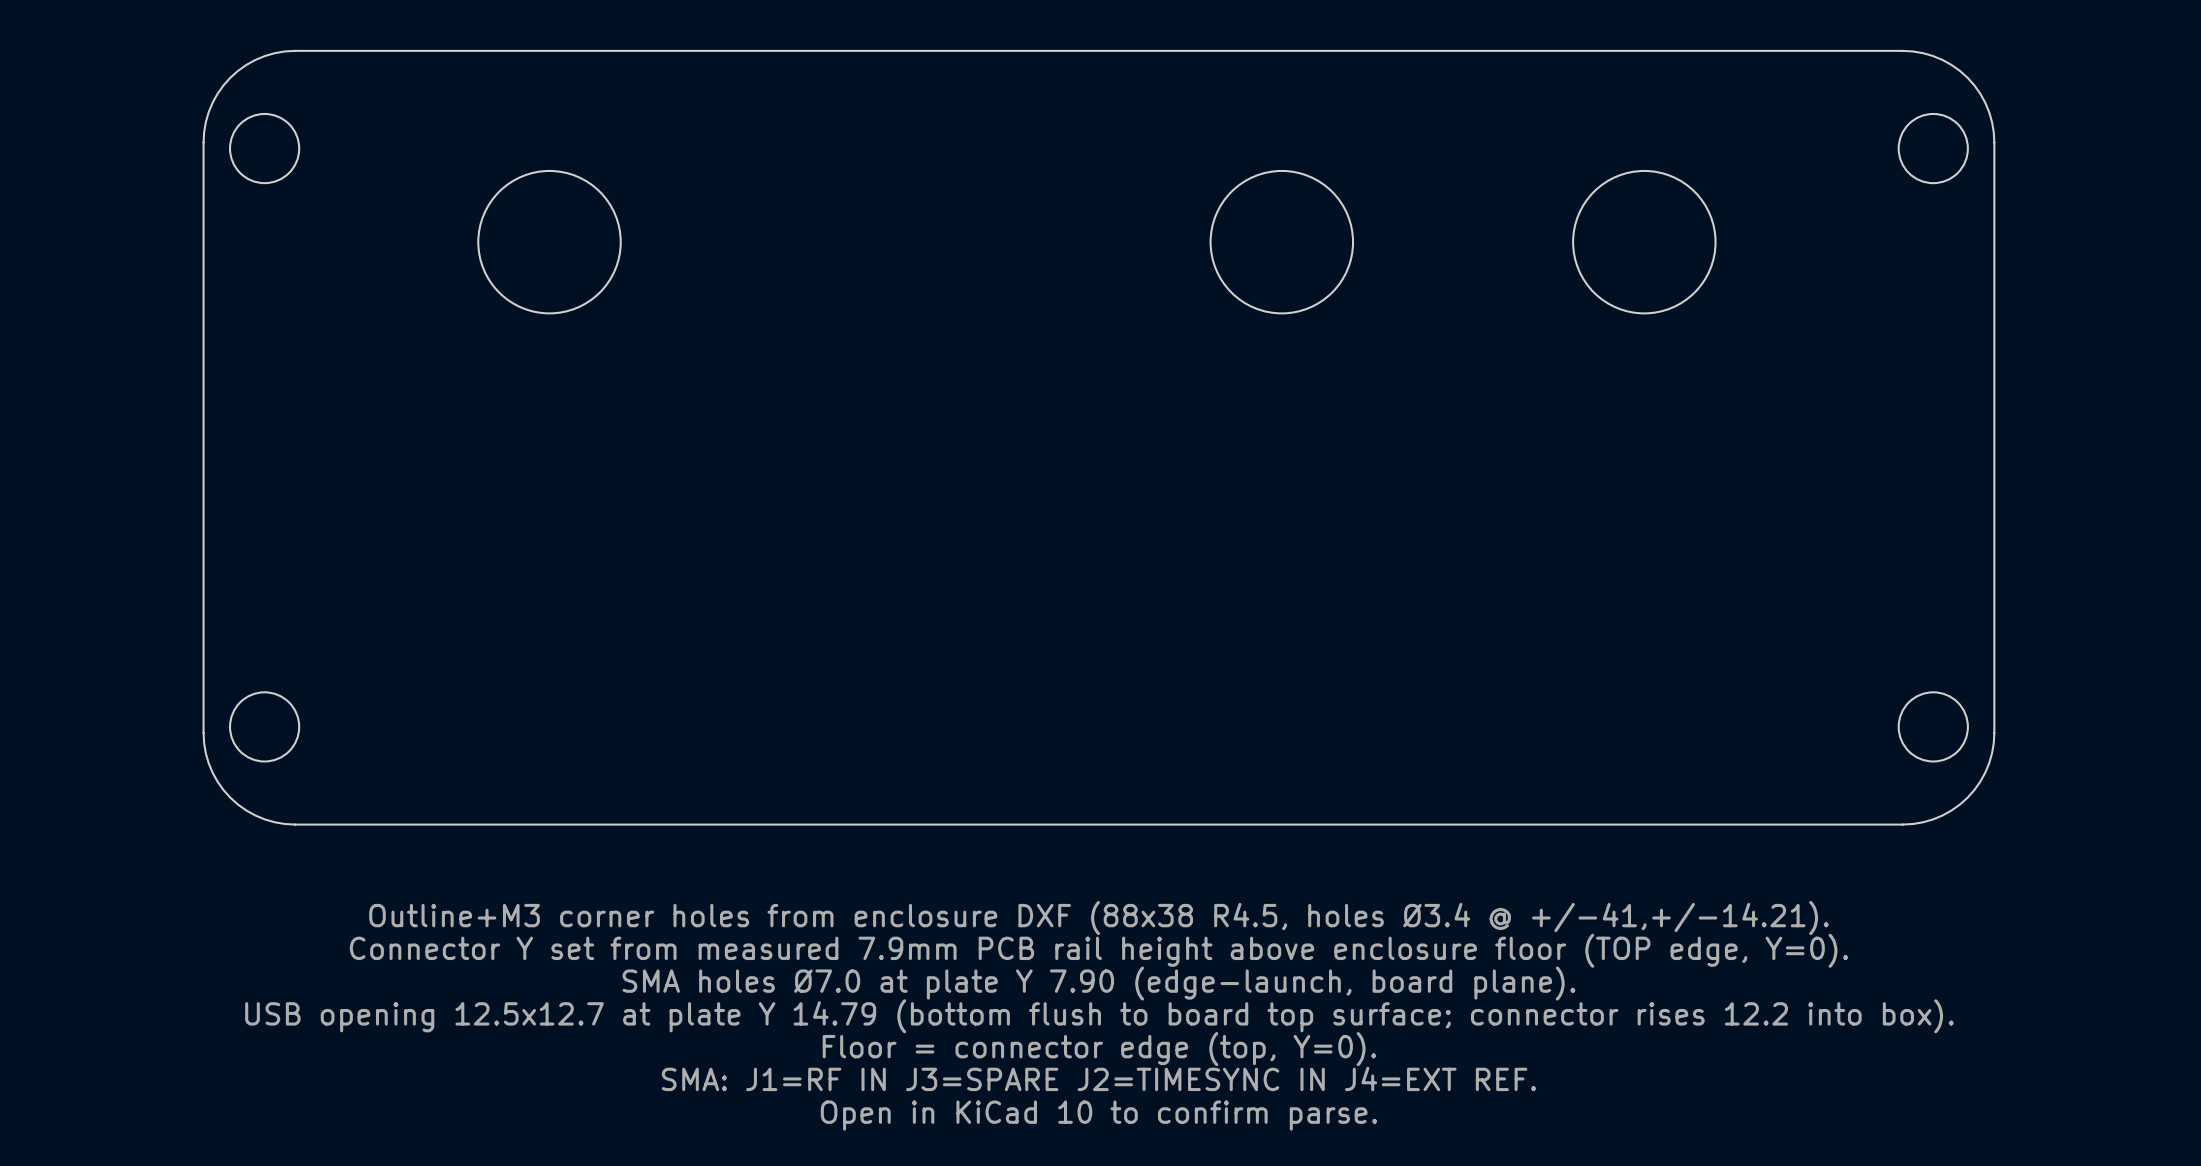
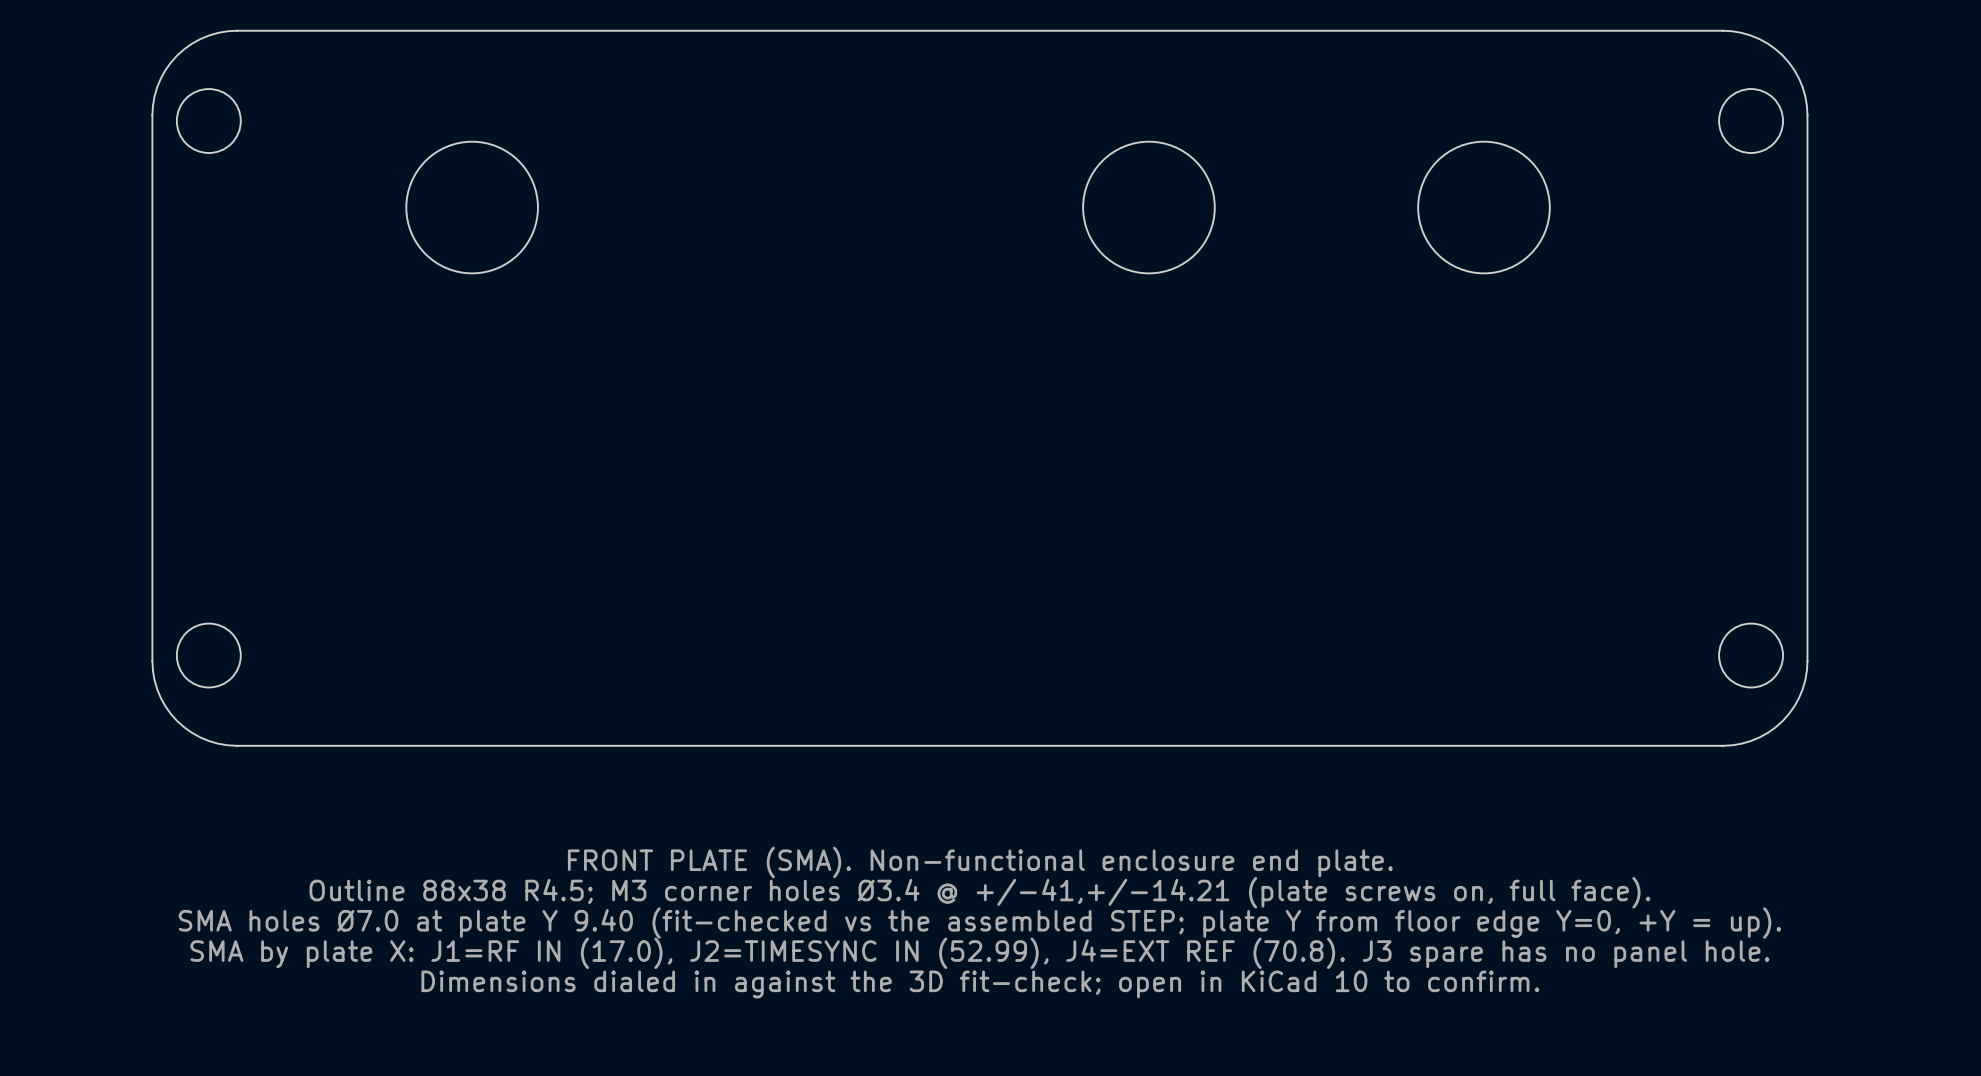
text: Outline+M3 corner holes from enclosure DXF (88x38 R4.5, holes Ø3.4 @ +/-41,+/-14.21). (1098, 918) -> none
text: Connector Y set from measured 7.9mm PCB rail height above enclosure floor (TOP edge, Y=0). (1098, 950) -> FRONT PLATE (SMA). Non-functional enclosure end plate. (980, 862)
text: SMA holes Ø7.0 at plate Y 7.90 (edge-launch, board plane). (1098, 983) -> Outline 88x38 R4.5; M3 corner holes Ø3.4 @ +/-41,+/-14.21 (plate screws on, full face). (979, 892)
text: USB opening 12.5x12.7 at plate Y 14.79 (bottom flush to board top surface; connector rises 12.2 into box). (1099, 1016) -> SMA holes Ø7.0 at plate Y 9.40 (fit-checked vs the assembled STEP; plate Y from floor edge Y=0, +Y = up). (979, 923)
text: Floor = connector edge (top, Y=0). (1099, 1049) -> SMA by plate X: J1=RF IN (17.0), J2=TIMESYNC IN (52.99), J4=EXT REF (70.8). J3 spare has no panel hole. (979, 953)
text: SMA: J1=RF IN J3=SPARE J2=TIMESYNC IN J4=EXT REF. (1098, 1078) -> Dimensions dialed in against the 3D fit-check; open in KiCad 10 to confirm. (980, 984)
text: Open in KiCad 10 to confirm parse. (1098, 1115) -> none

